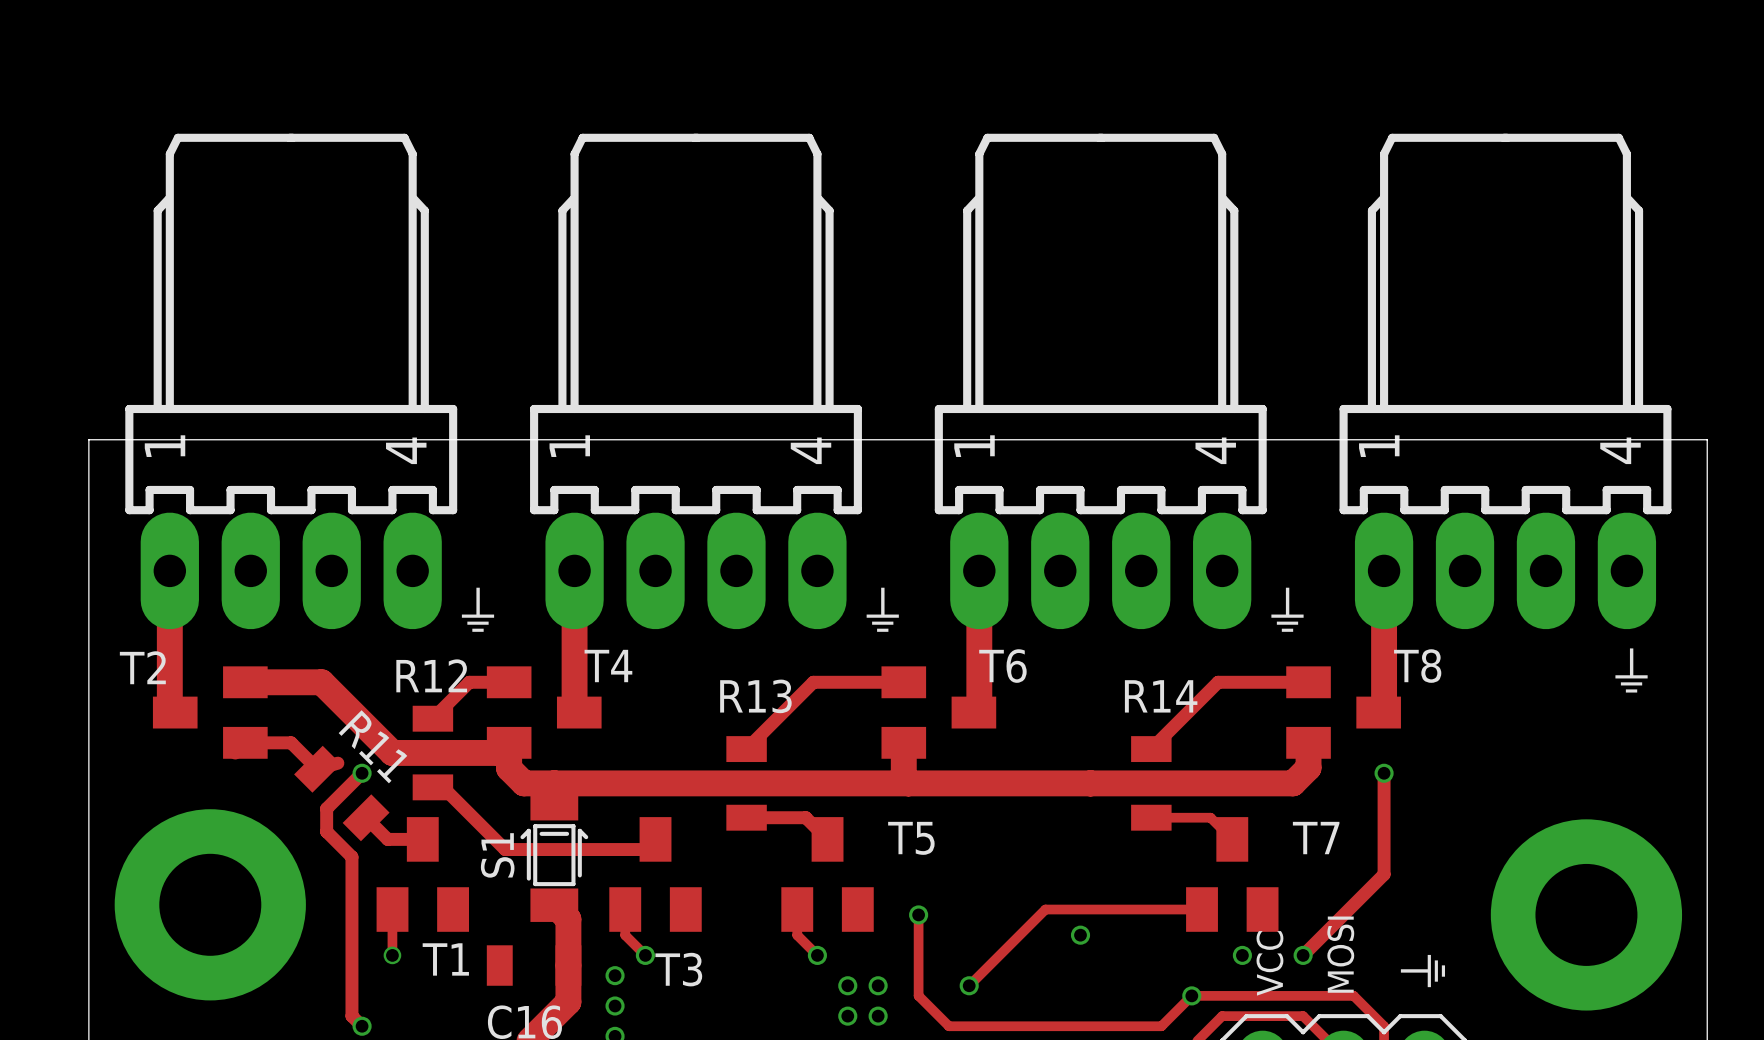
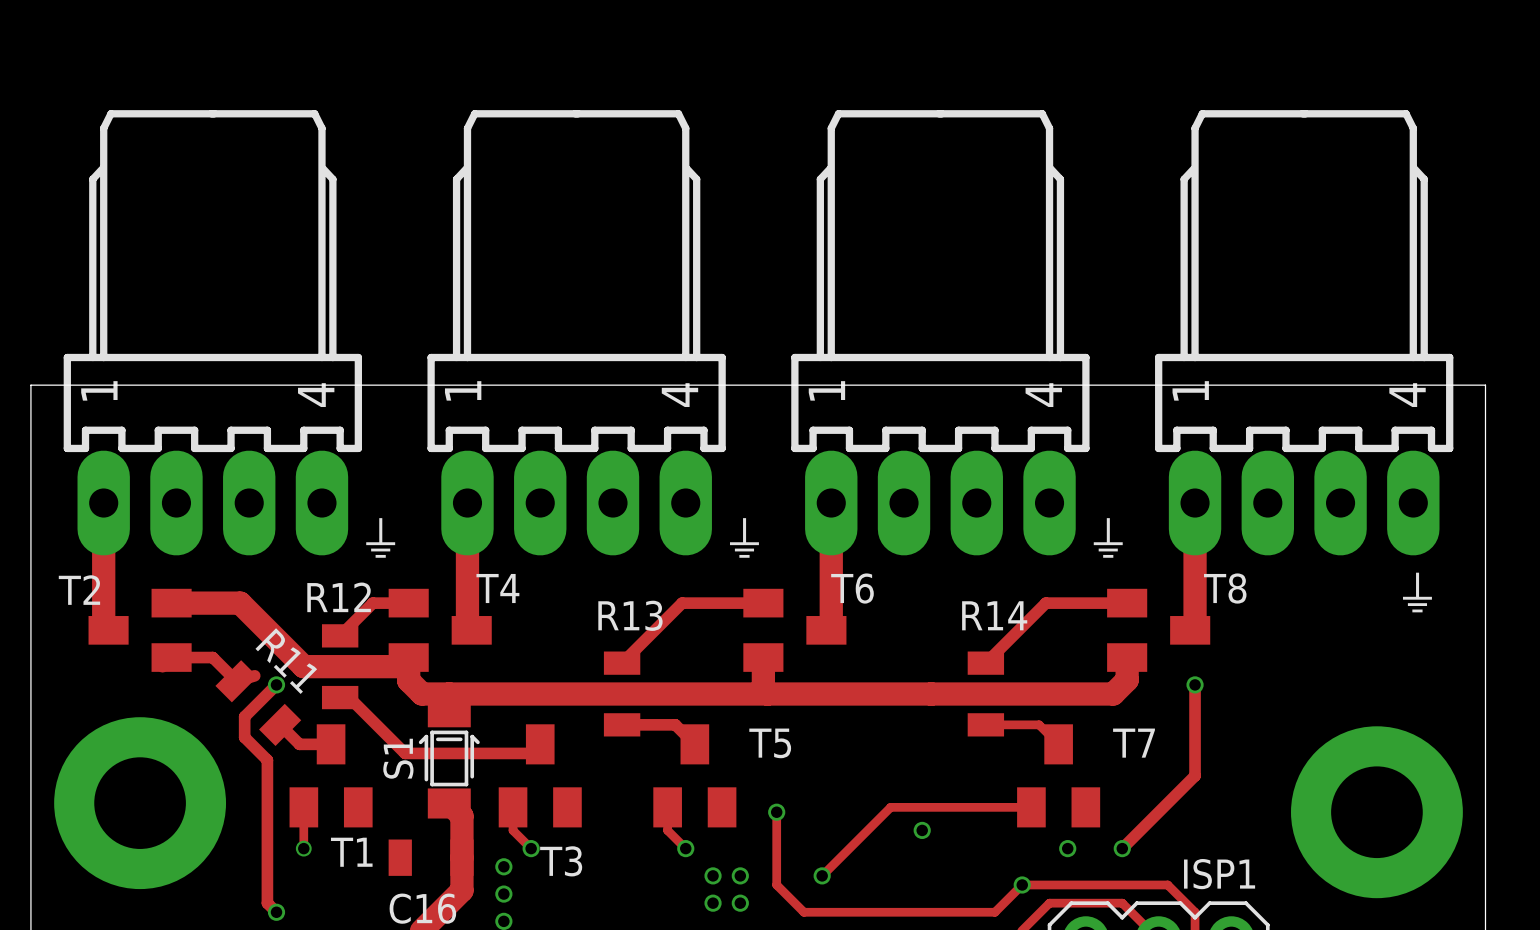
text: MOSI (1340, 954) -> none
text: VCC (1269, 963) -> none
text: ⏚ (1422, 971) -> none
ISP1 name: none -> ISP1 (1219, 874)

